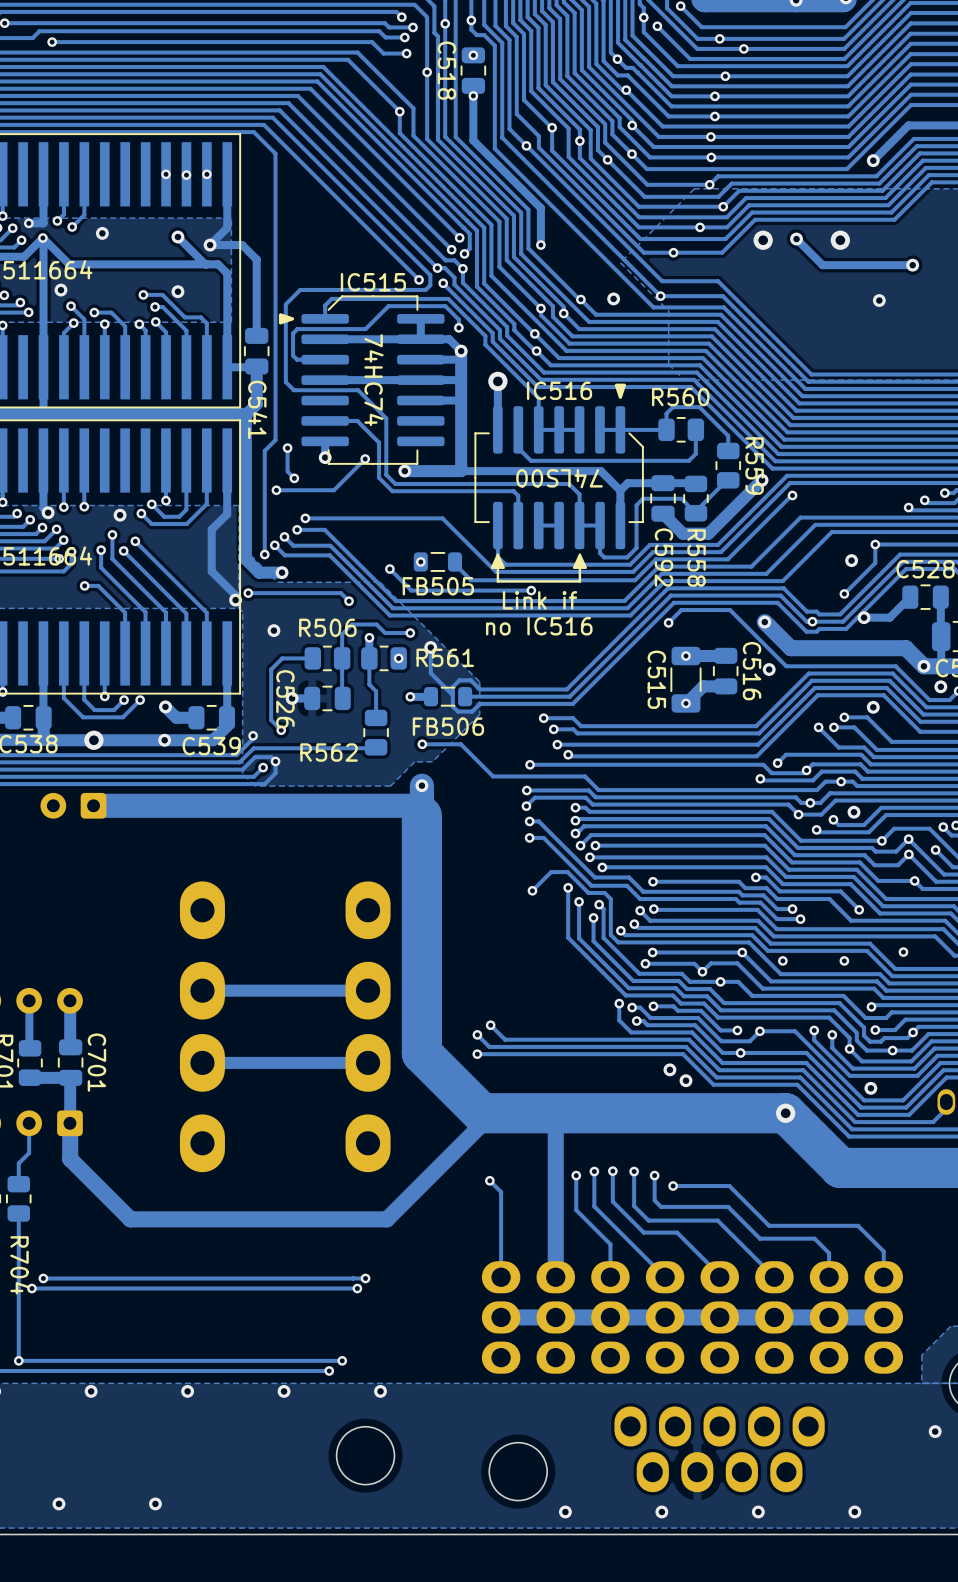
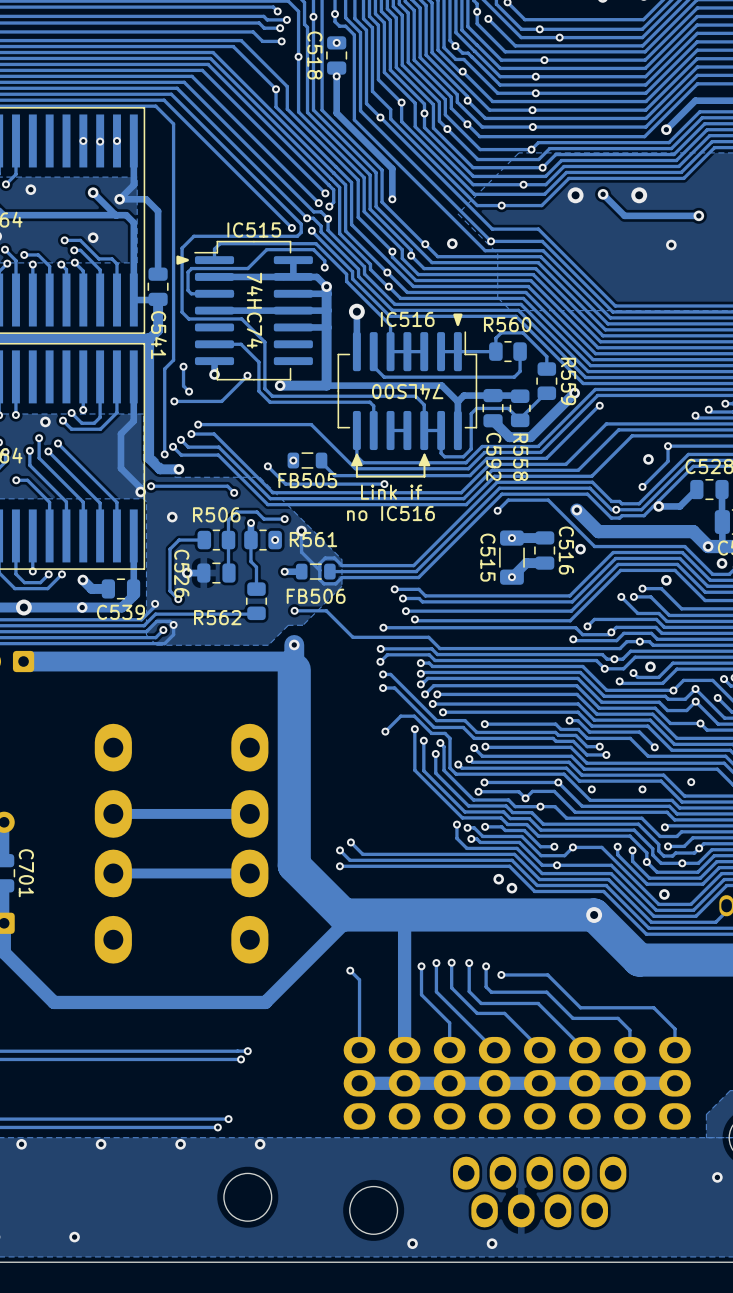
IC515 footprint: [278, 295, 445, 465] -> [176, 240, 313, 381]
IC516 footprint: [474, 383, 644, 550] -> [337, 313, 478, 451]
via: (758, 1511) -> none
via: (854, 1511) -> none

